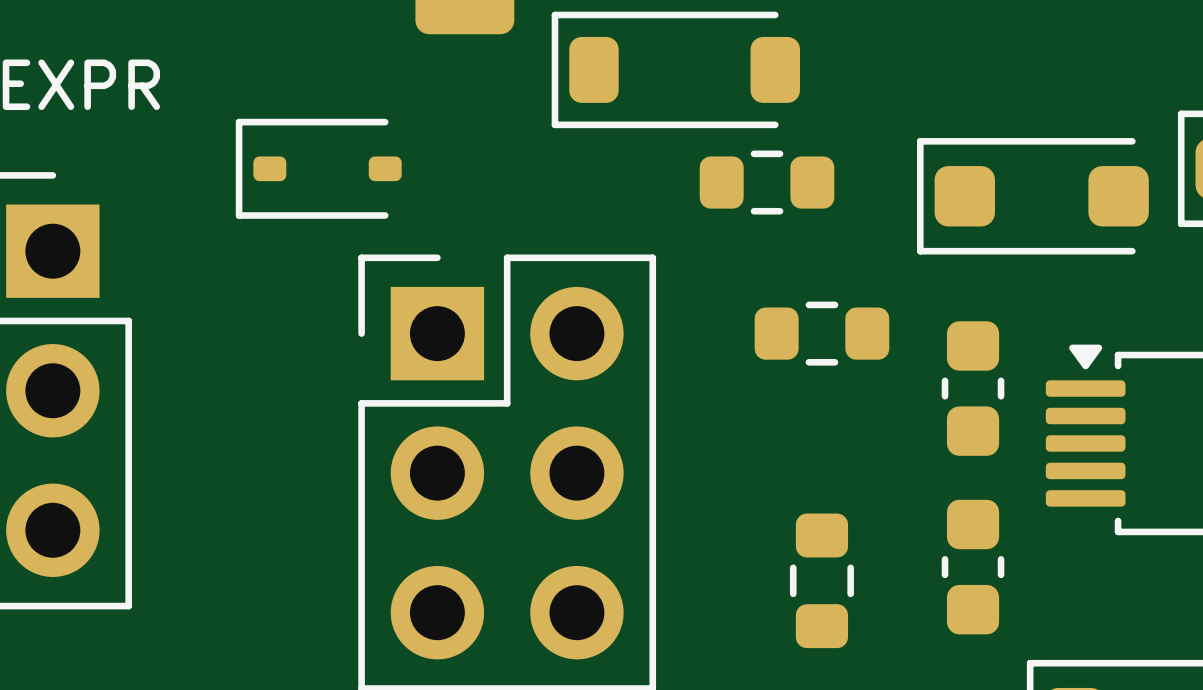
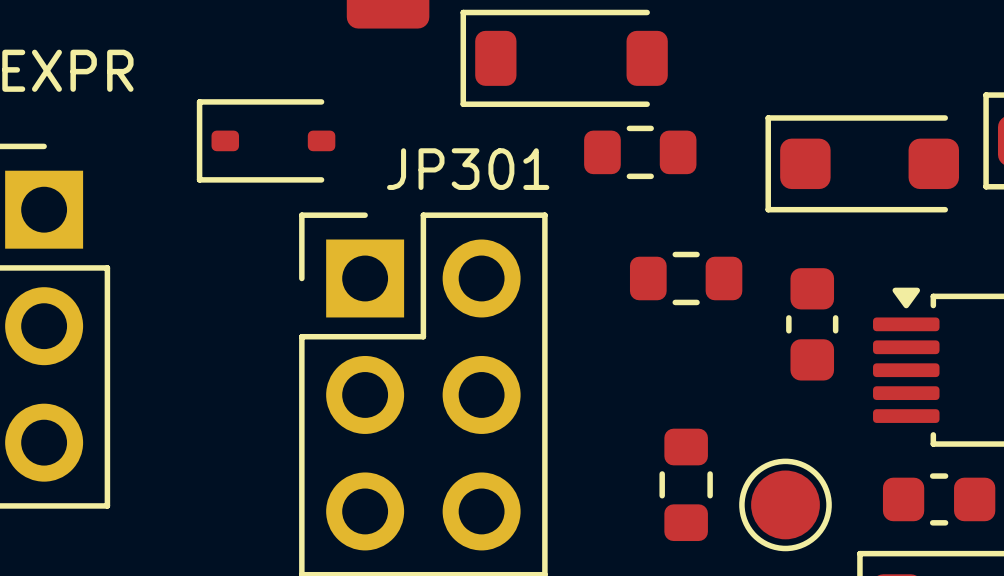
JP301 name: none -> JP301 (468, 169)
part footprint: [941, 499, 1005, 635] -> [739, 458, 832, 552]
part: none -> (939, 499)

